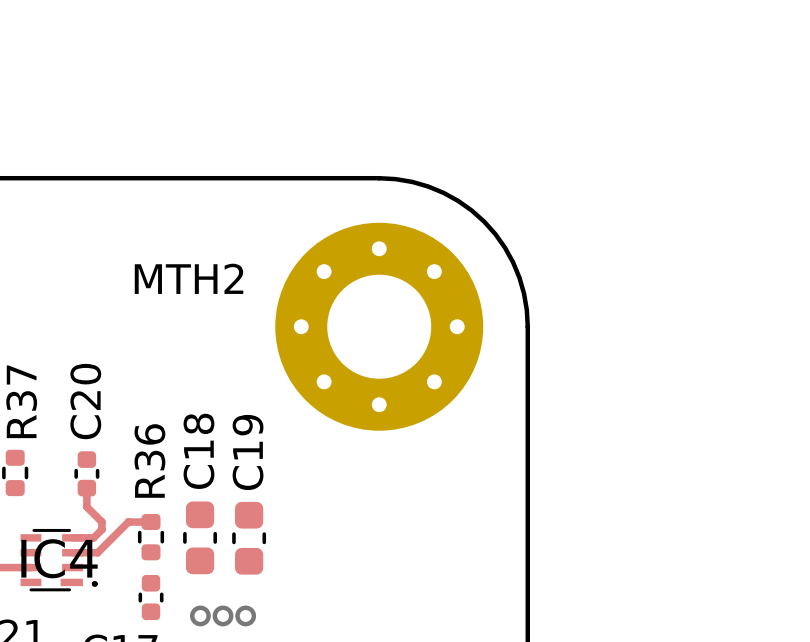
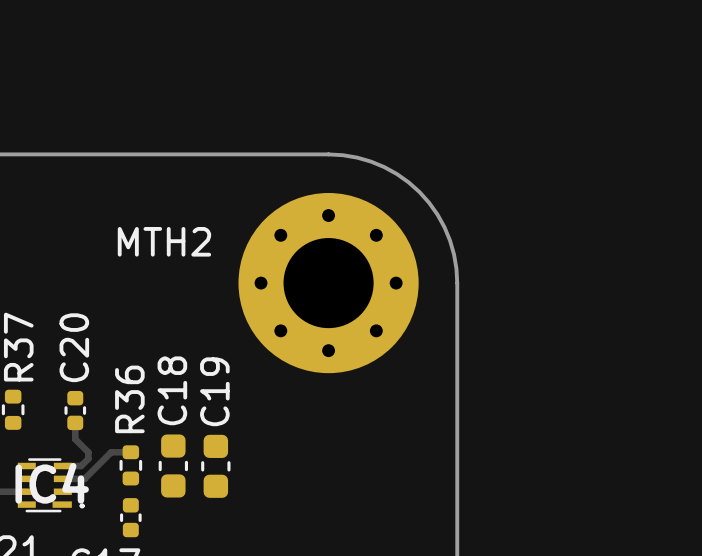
via: (200, 615) -> none
via: (223, 615) -> none
via: (245, 615) -> none

